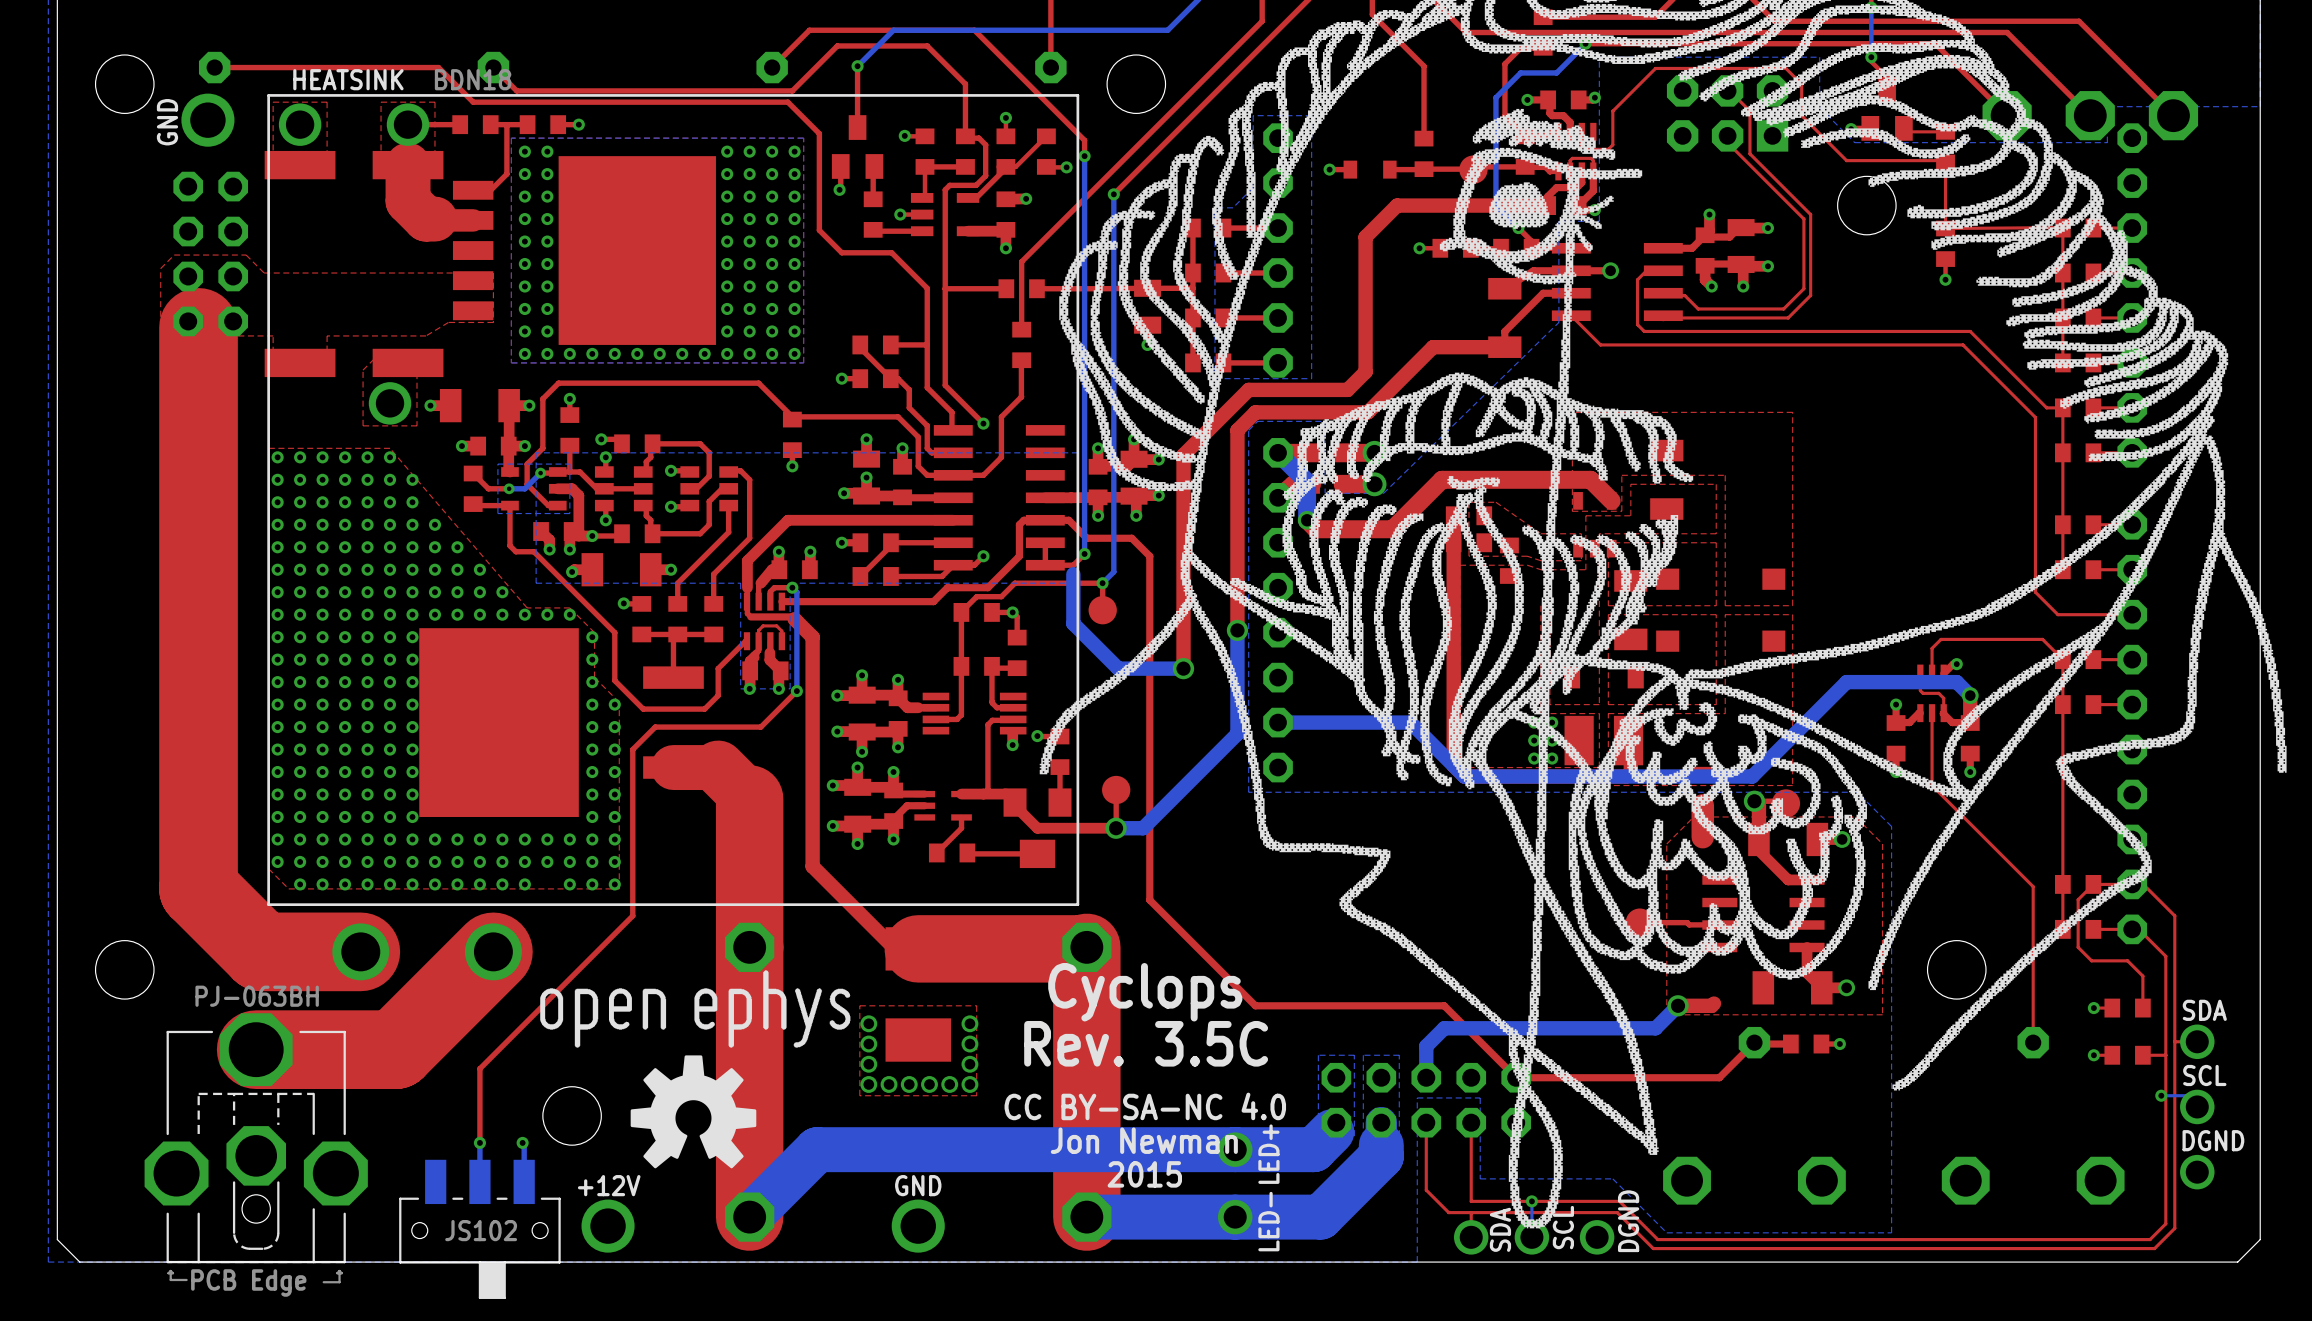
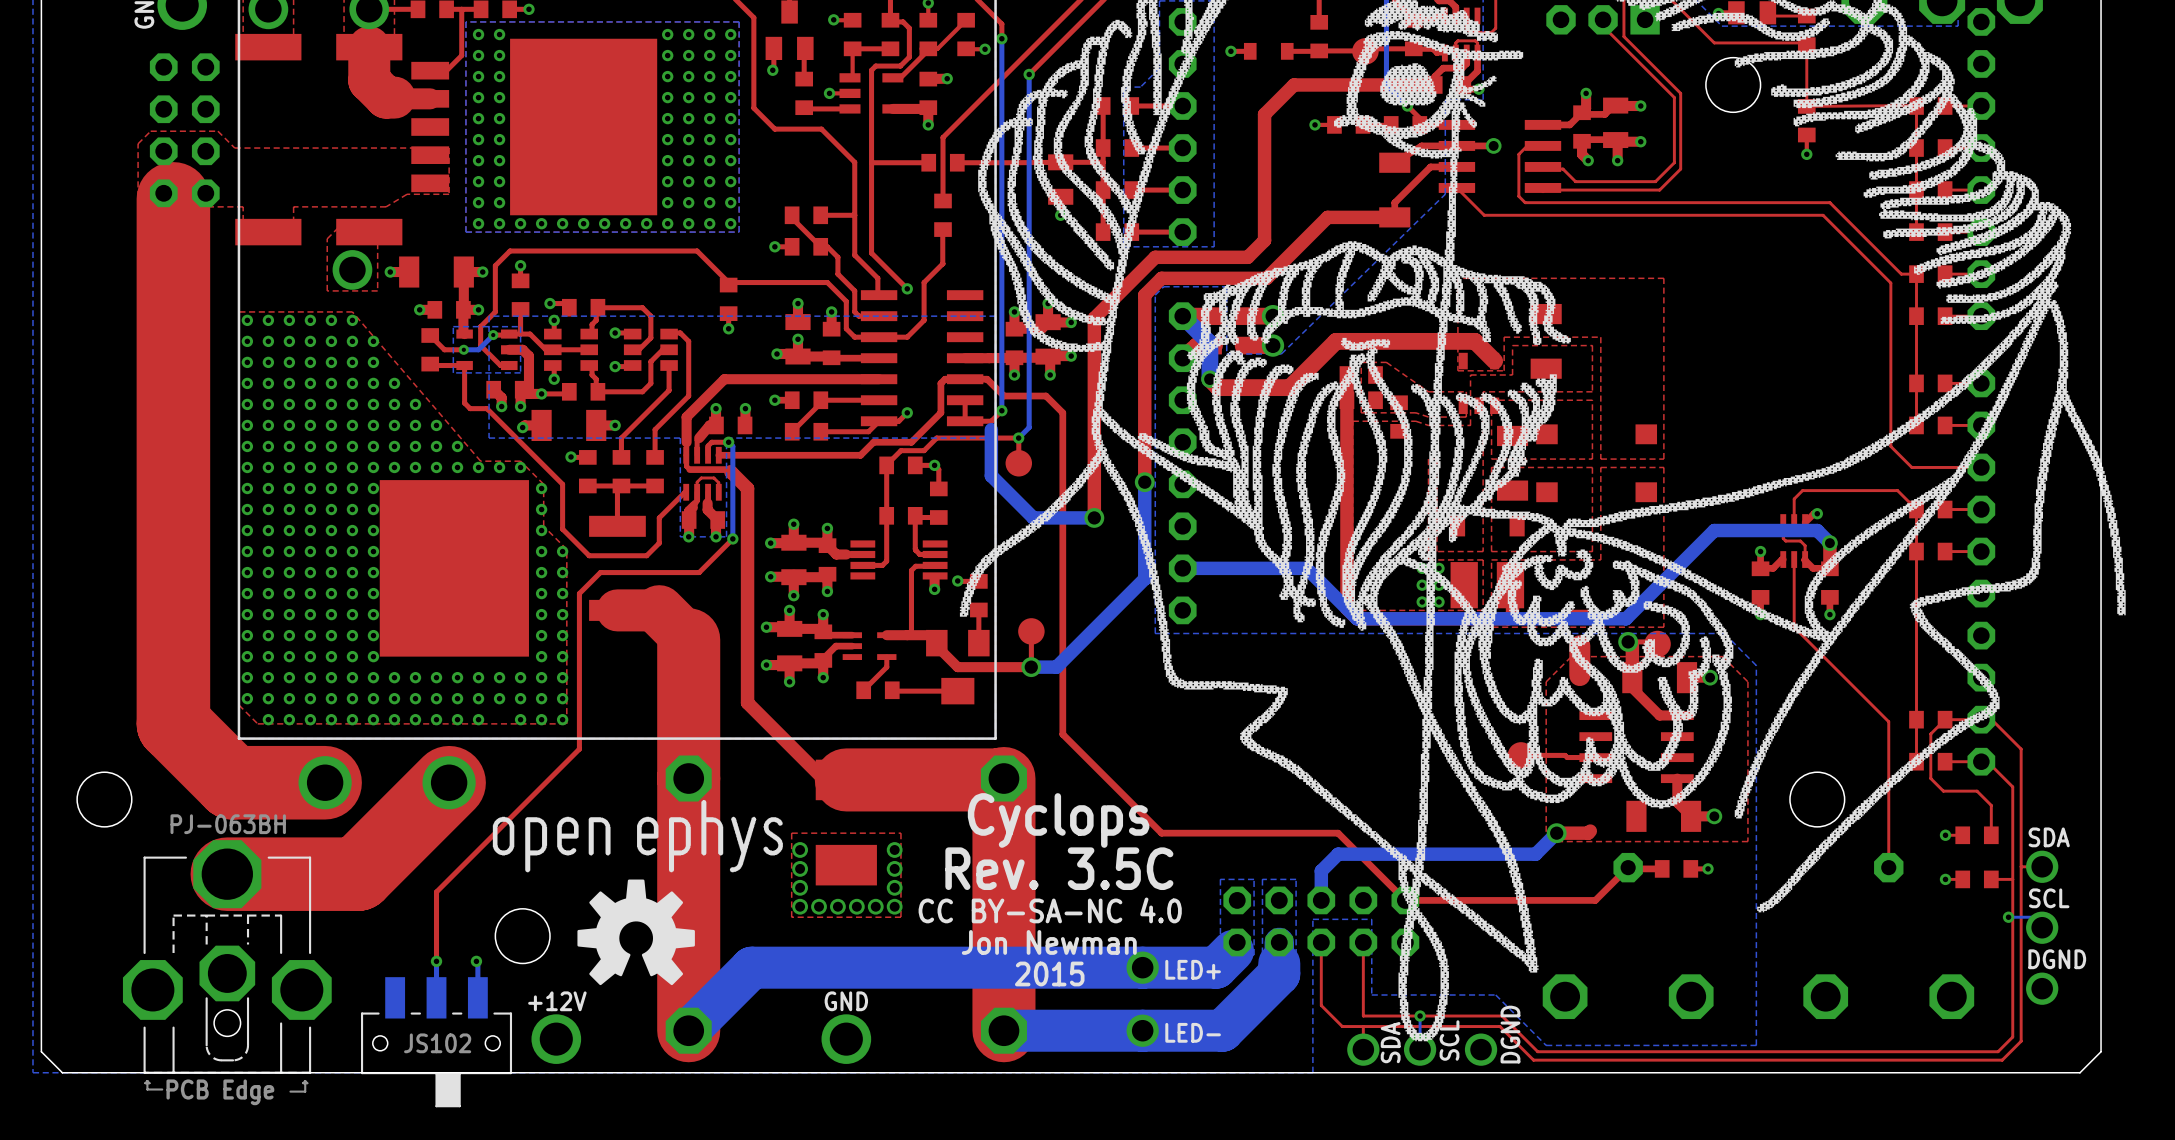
text position: CC BY-SA-NC 4.0 (1145, 1106) -> CC BY-SA-NC 4.0 (1050, 910)
text position: Jon Newman (1144, 1140) -> Jon Newman (1049, 942)
text rotation: 0° (1268, 1154) -> 90° clockwise (1193, 969)
text position: 2015 (1144, 1174) -> 2015 (1049, 973)
text rotation: 0° (1268, 1221) -> 90° clockwise (1193, 1032)

